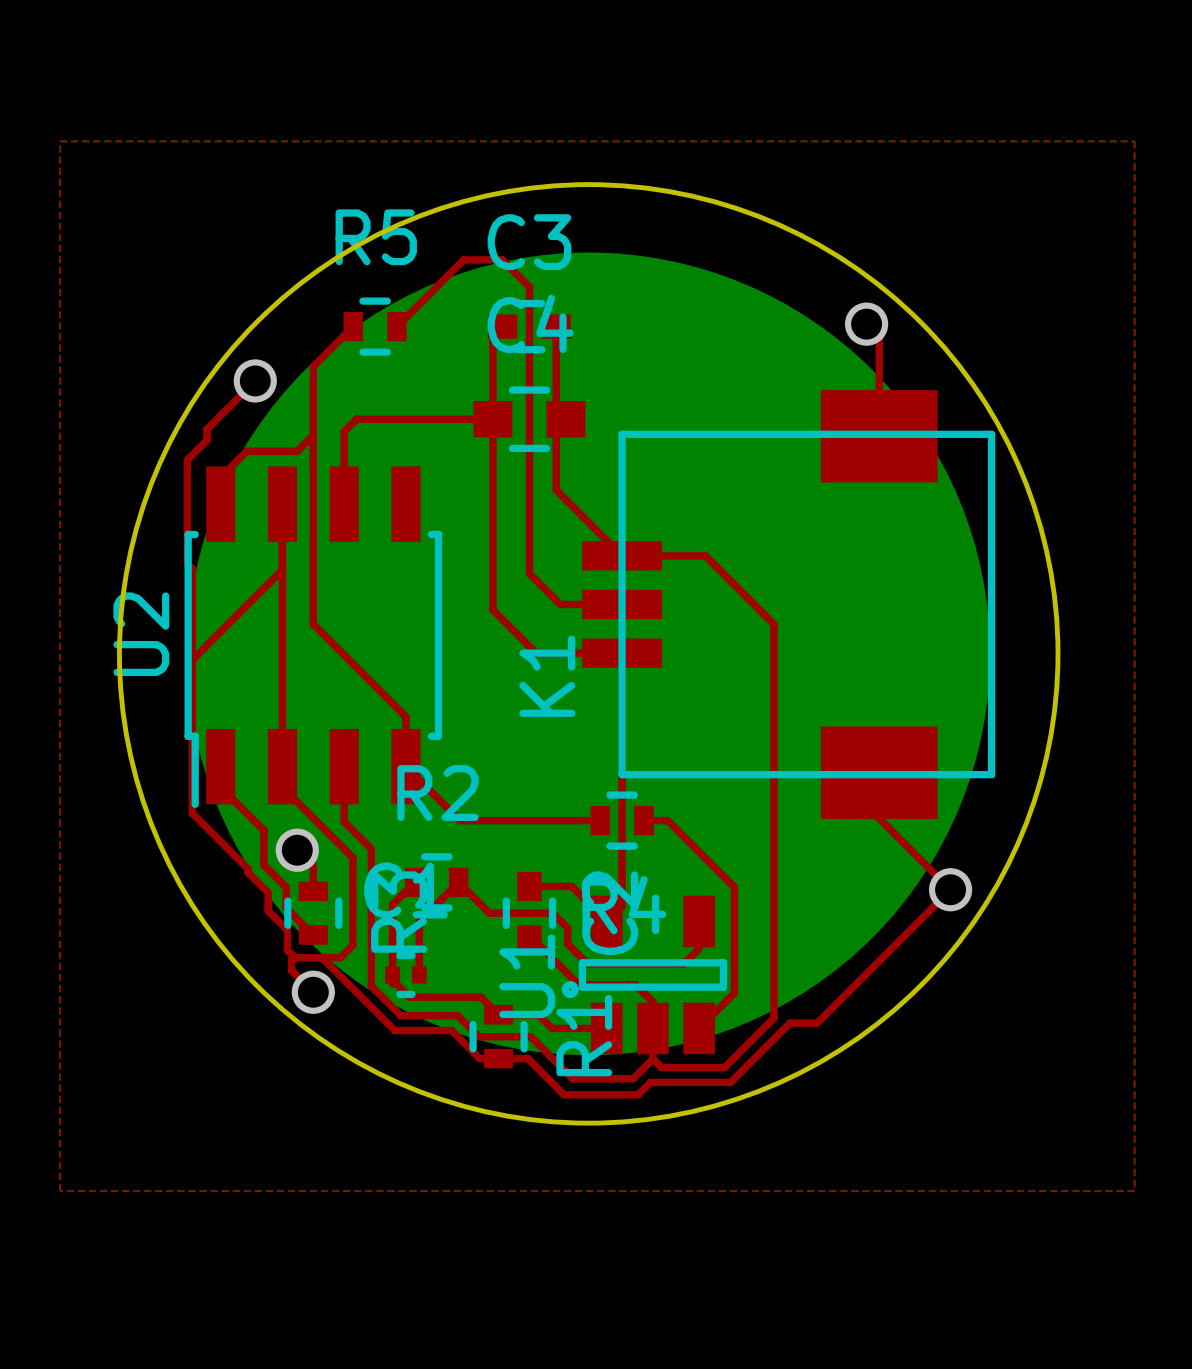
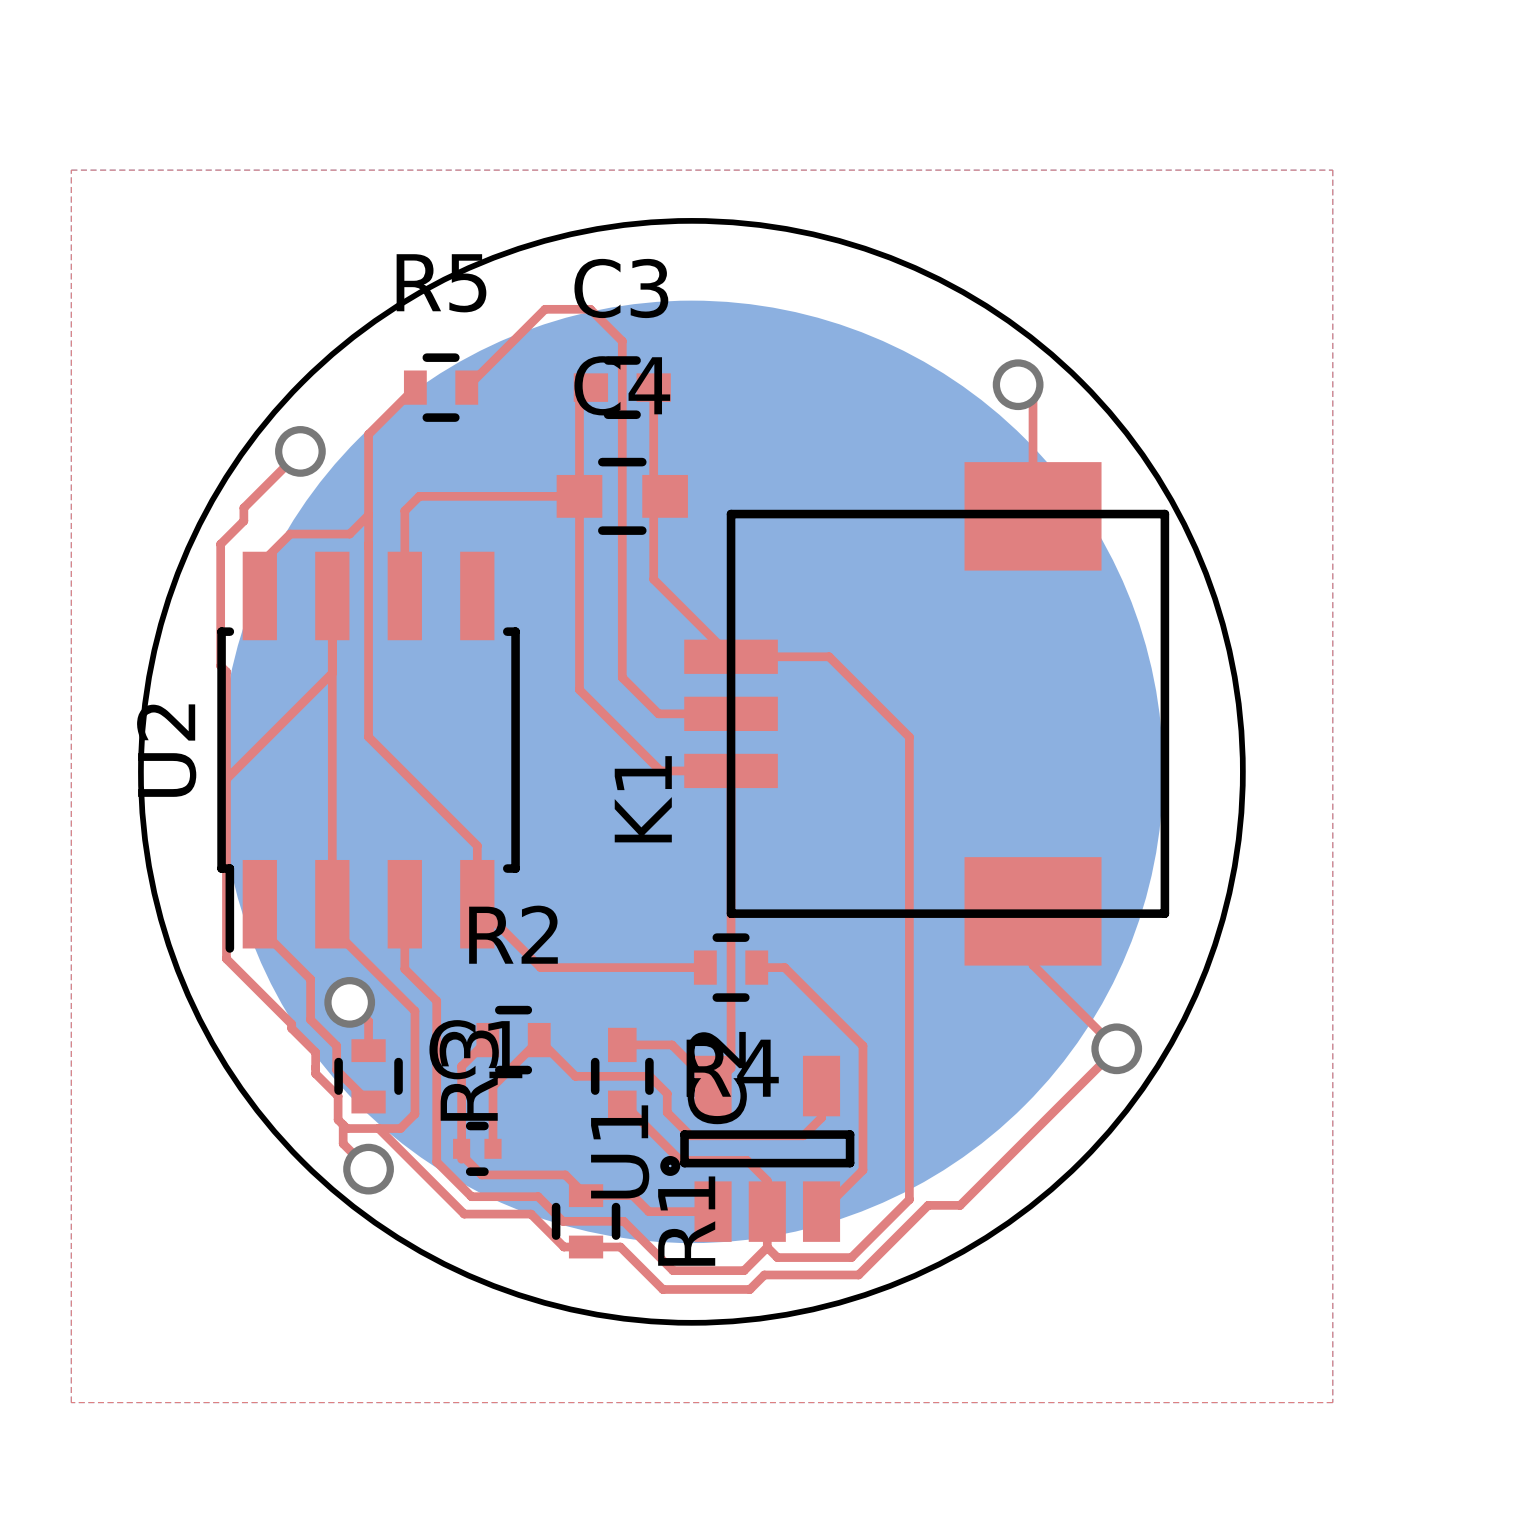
top track: (492, 584) (492, 610) (536, 653) (562, 653) -> (579, 689) (660, 770)

